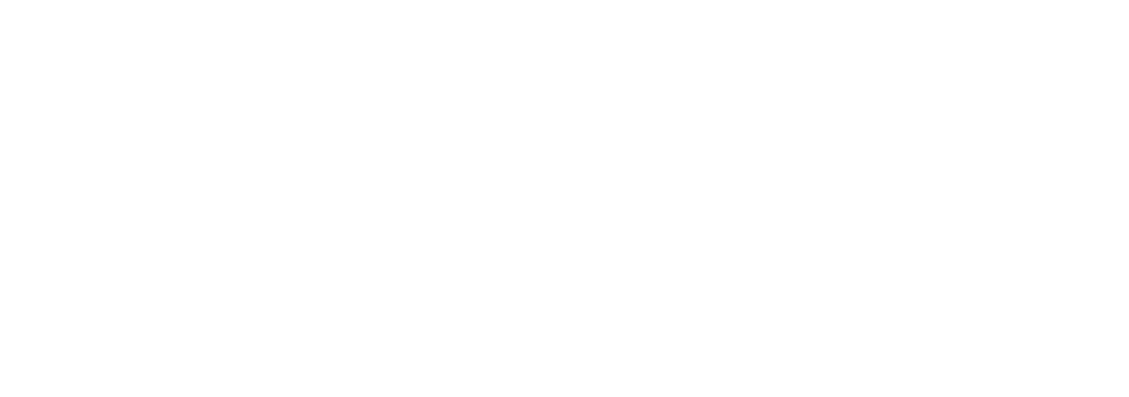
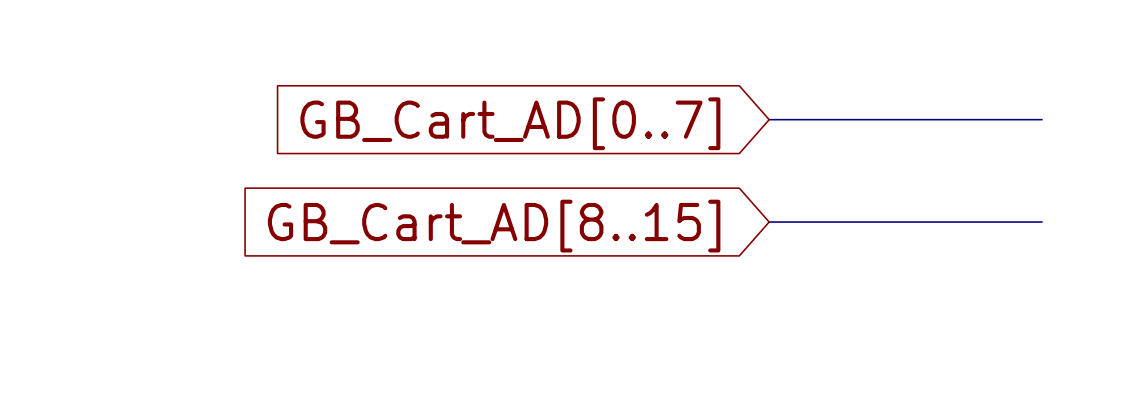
bus: none -> (769, 119) (1042, 119)
global label: none -> GB_Cart_AD[0..7] (510, 123)
bus: none -> (769, 222) (1042, 222)
global label: none -> GB_Cart_AD[8..15] (494, 226)

